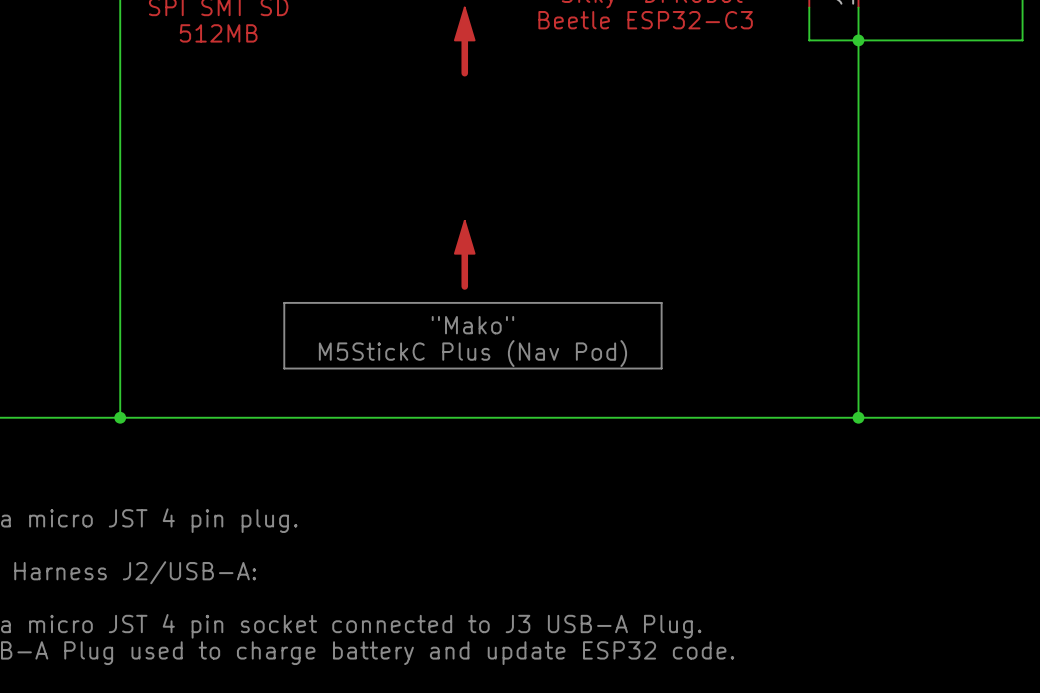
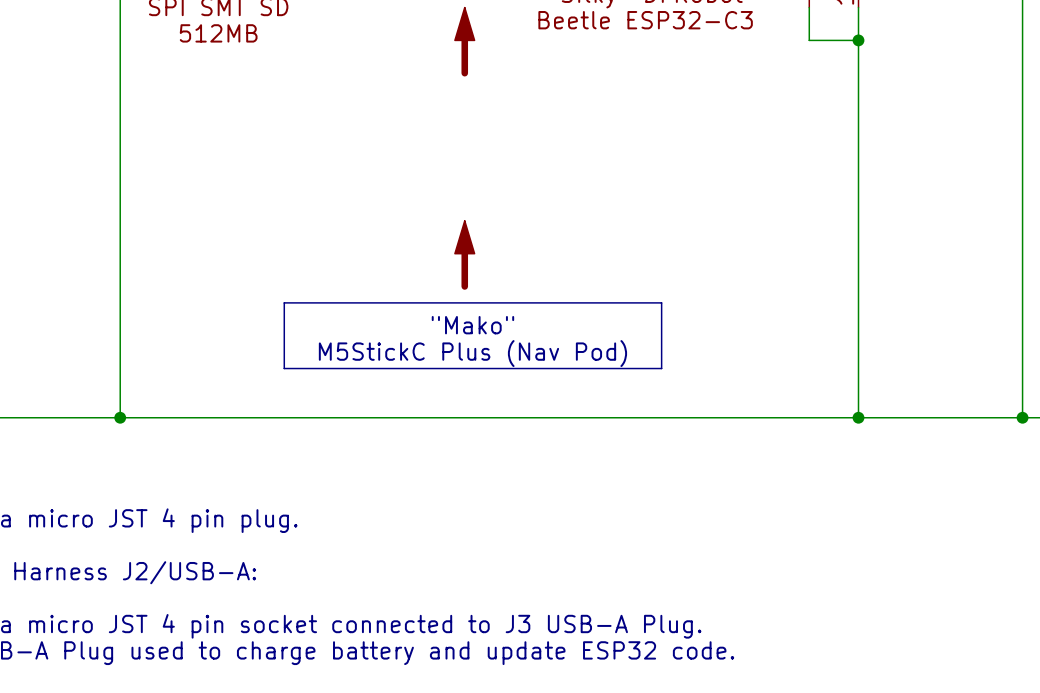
wire: (858, 40) (1022, 40) -> (1022, 417) (1022, 40)
junction: none -> (1022, 417)

